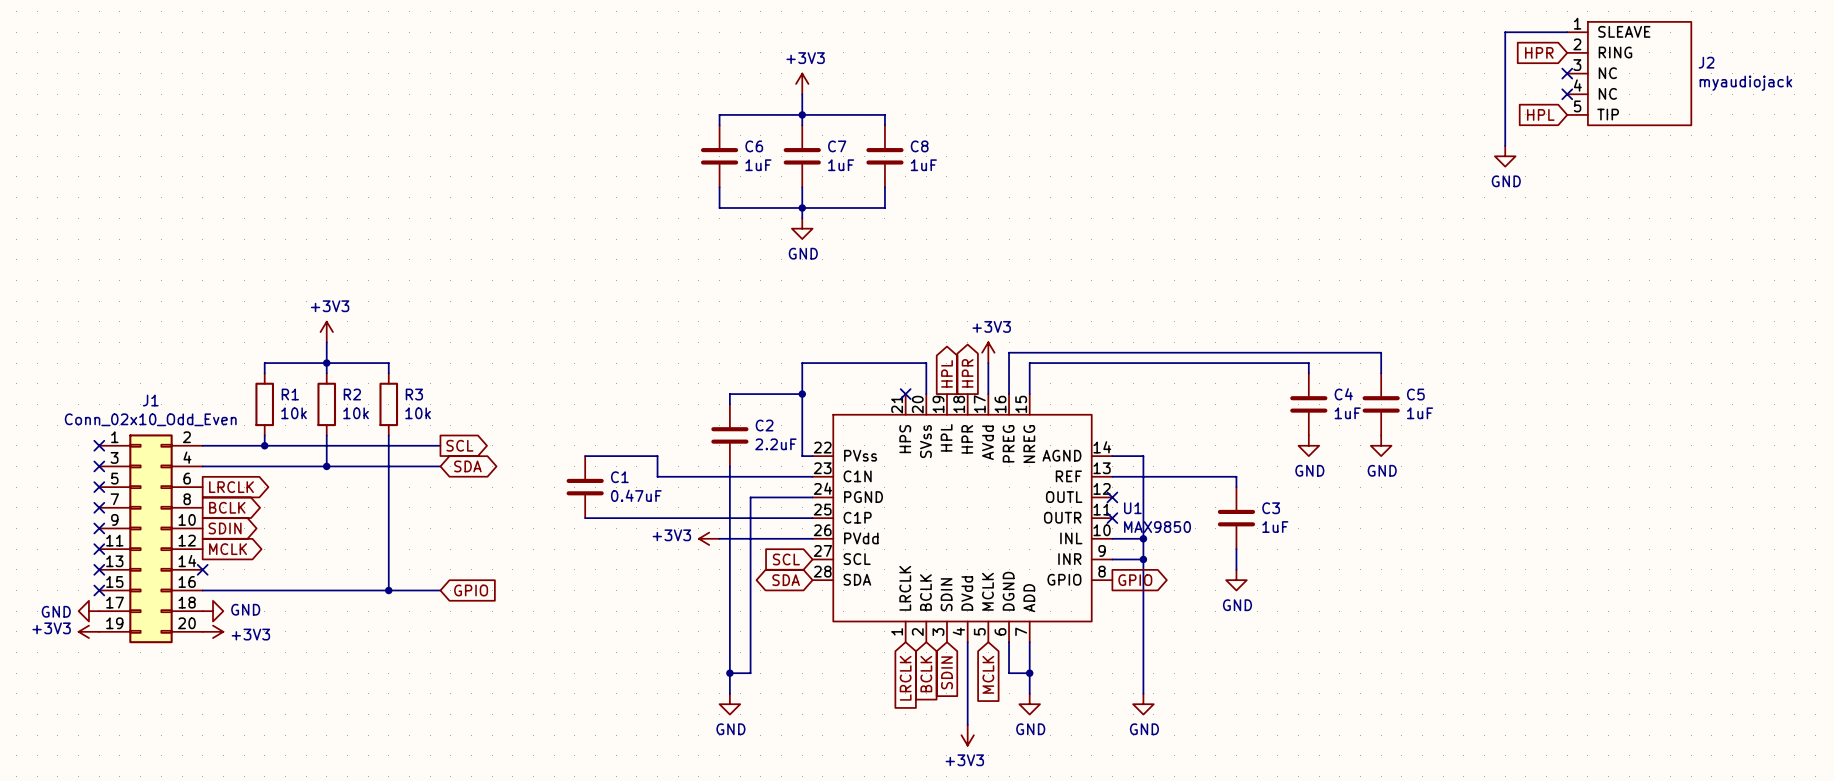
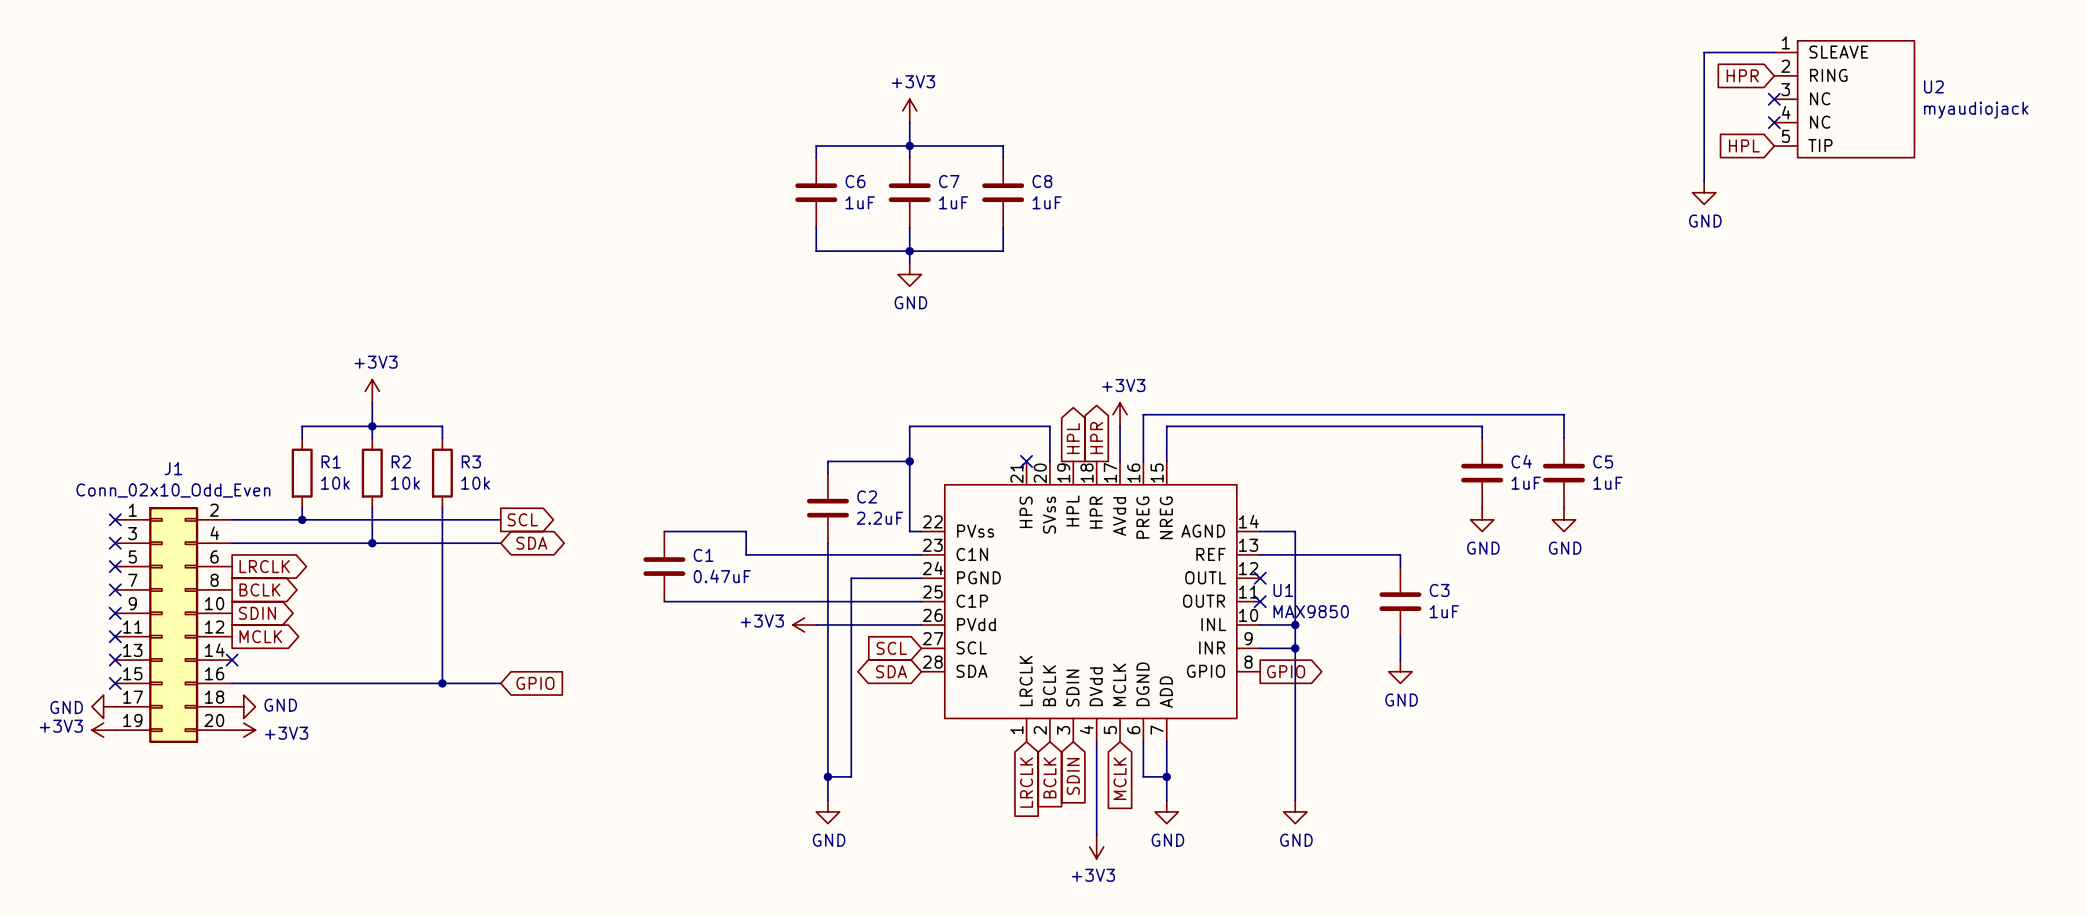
J2 name: J2 (1706, 62) -> U2 (1933, 86)

